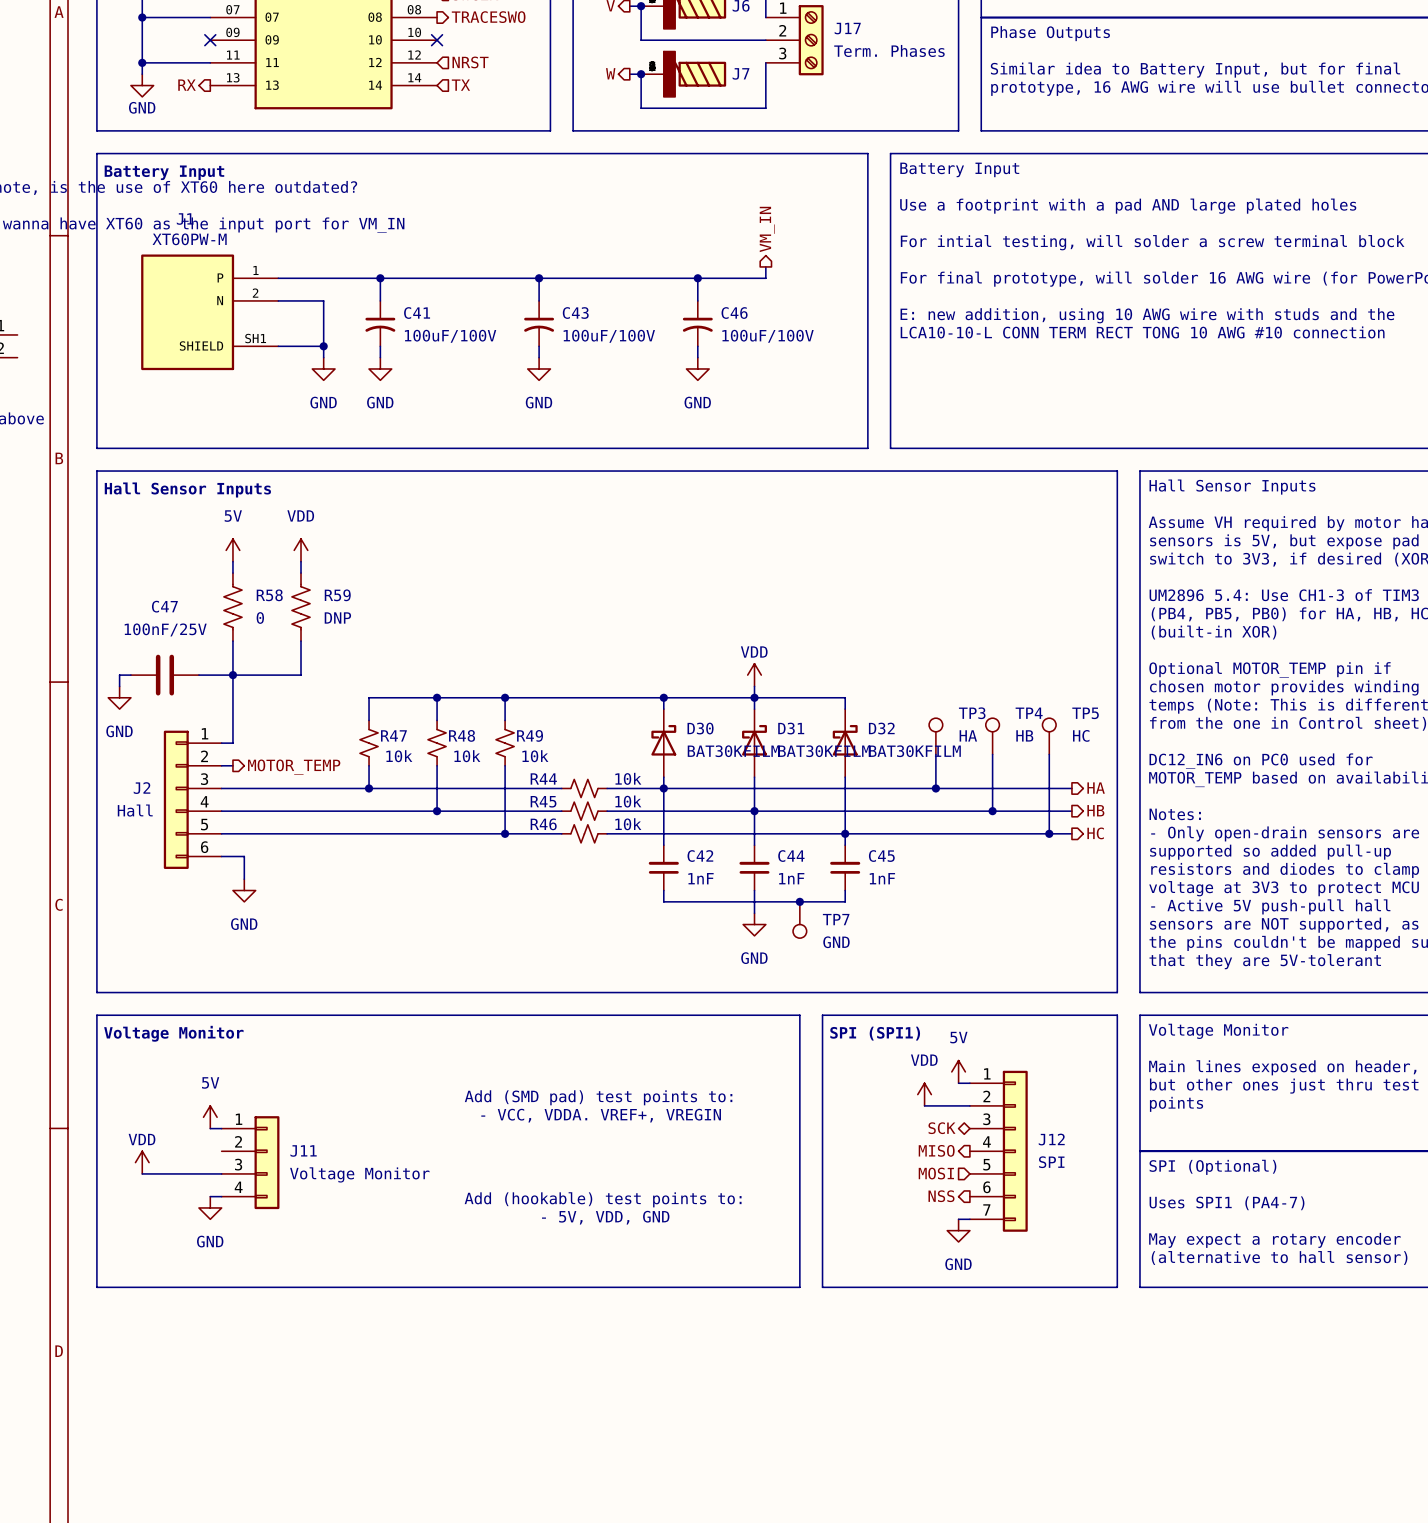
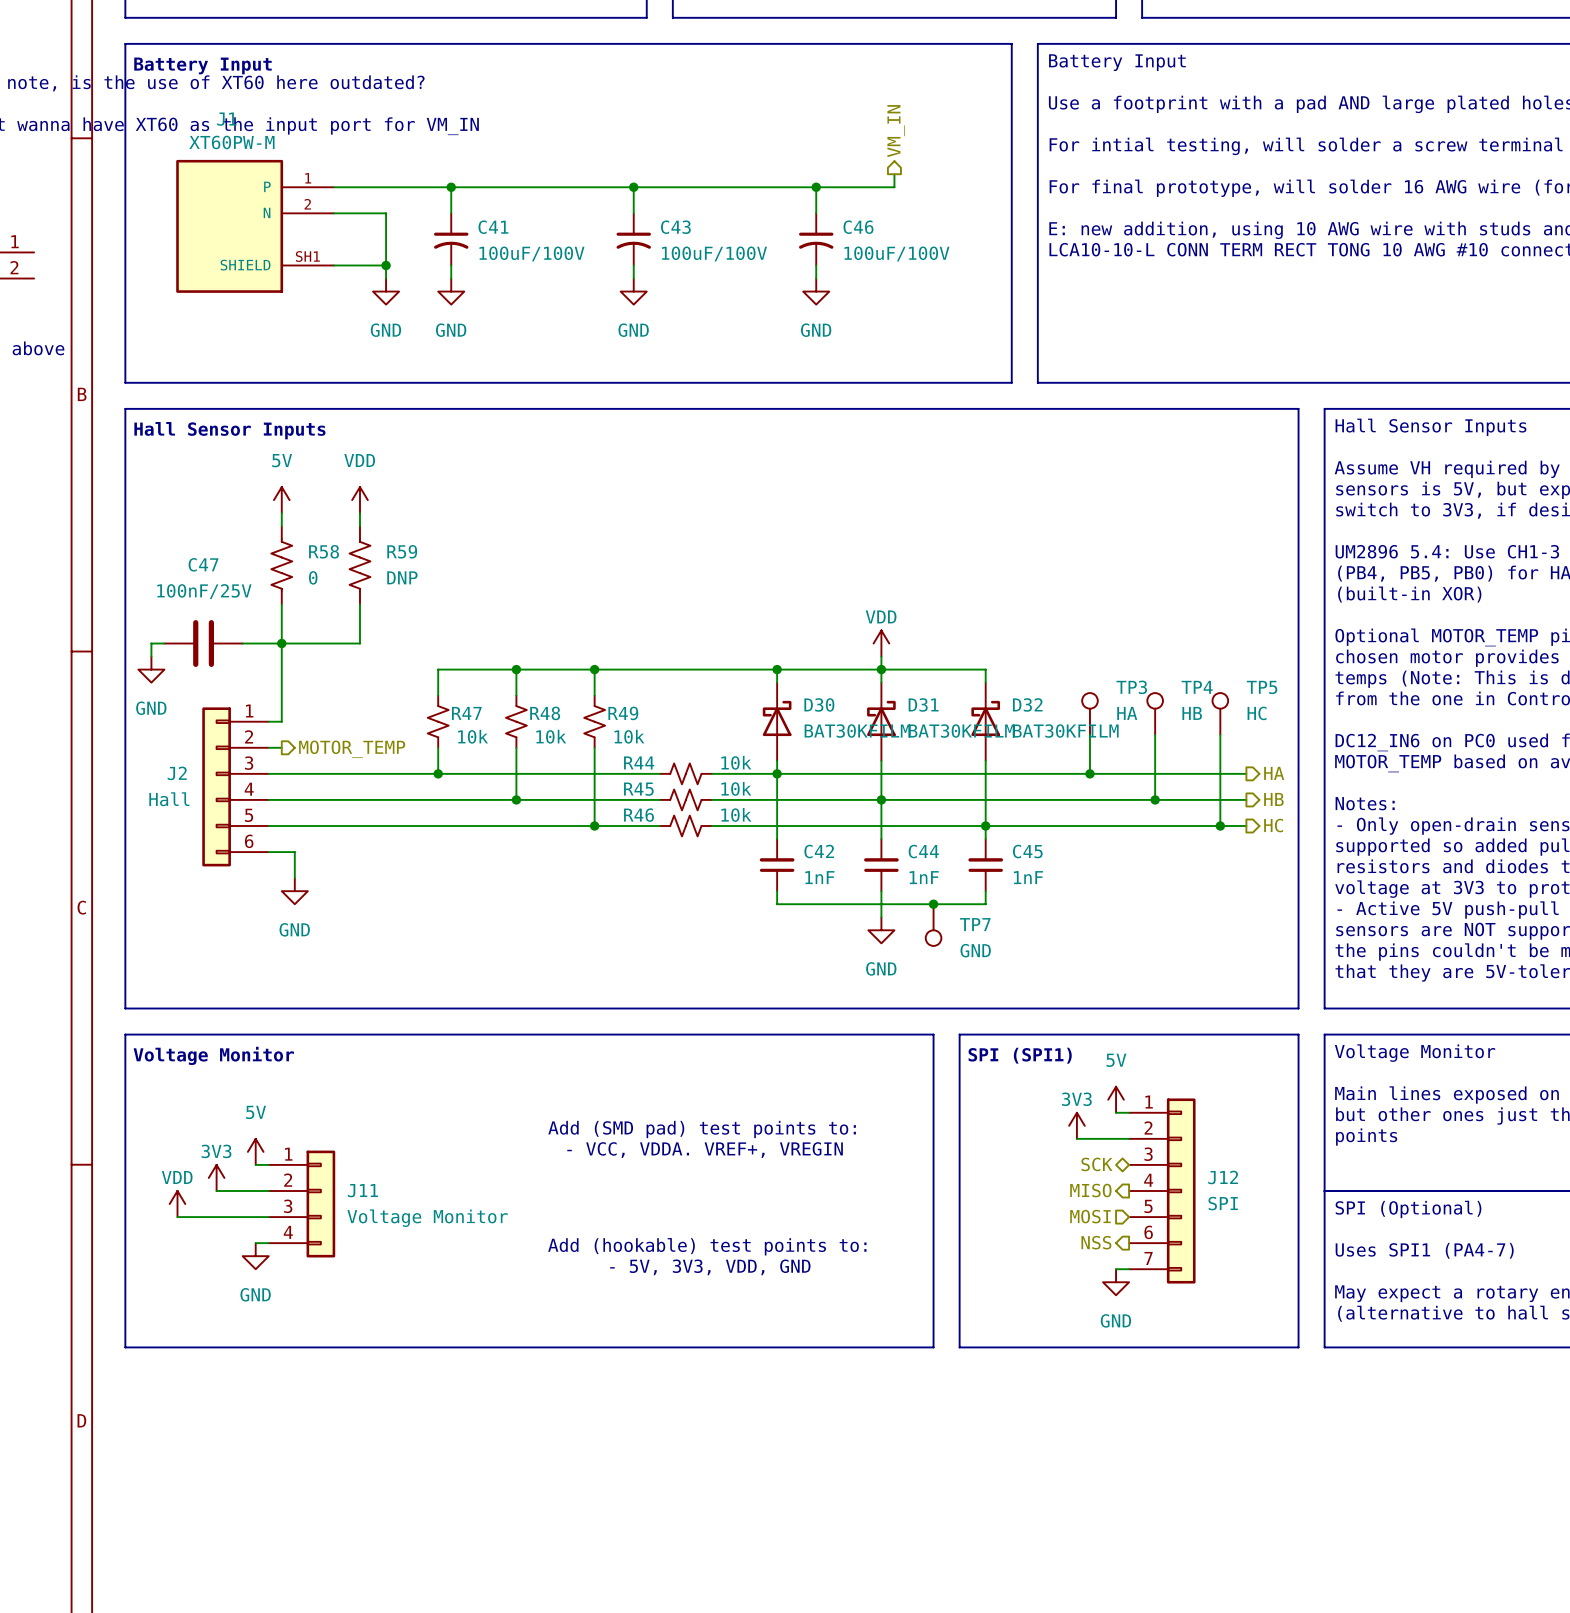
power symbol: VDD (924, 1094) -> 3V3 (1076, 1125)
power symbol: none -> 3V3 (216, 1177)
wire: none -> (216, 1191) (268, 1191)
text: - 5V, VDD, GND (605, 1217) -> - 5V, 3V3, VDD, GND (710, 1267)

